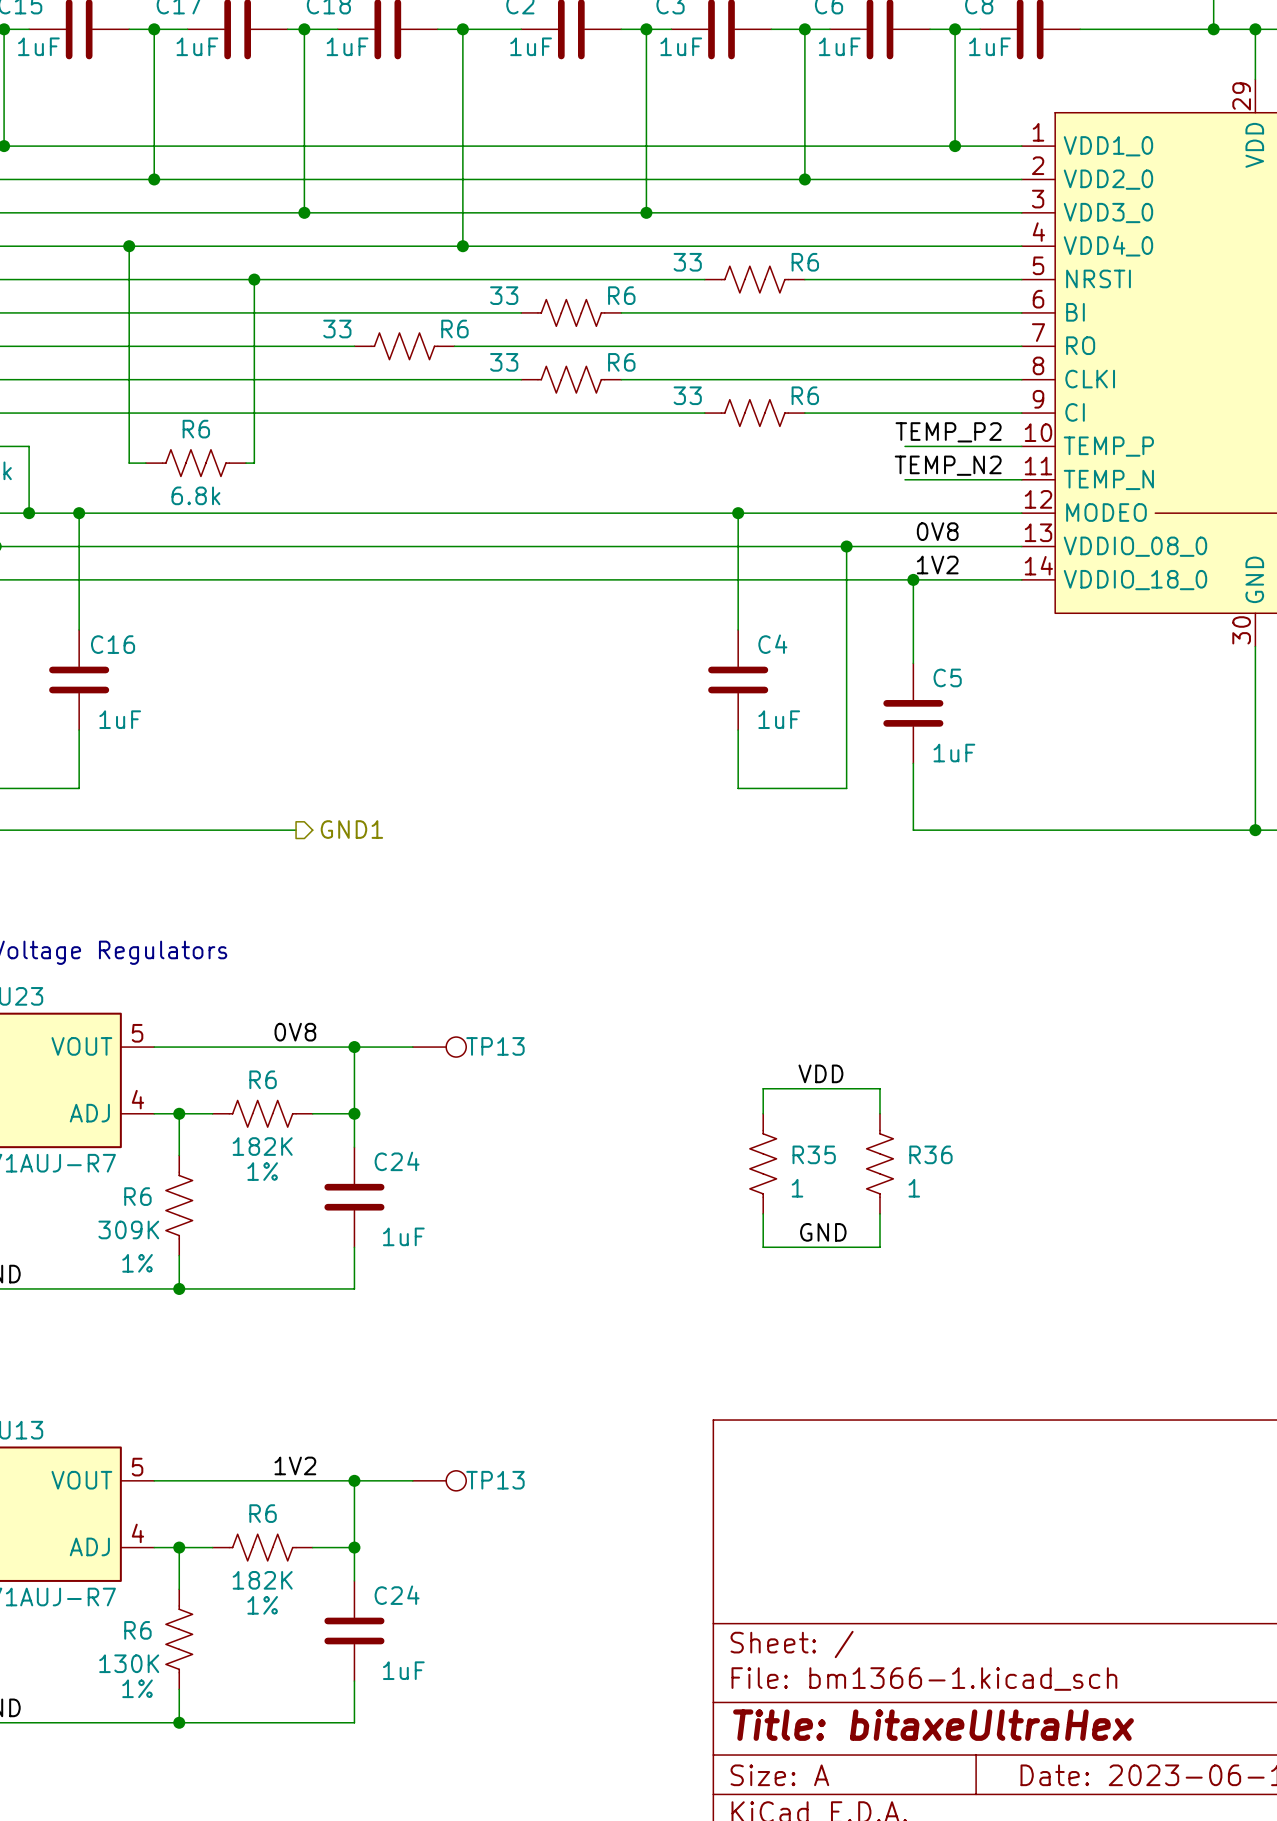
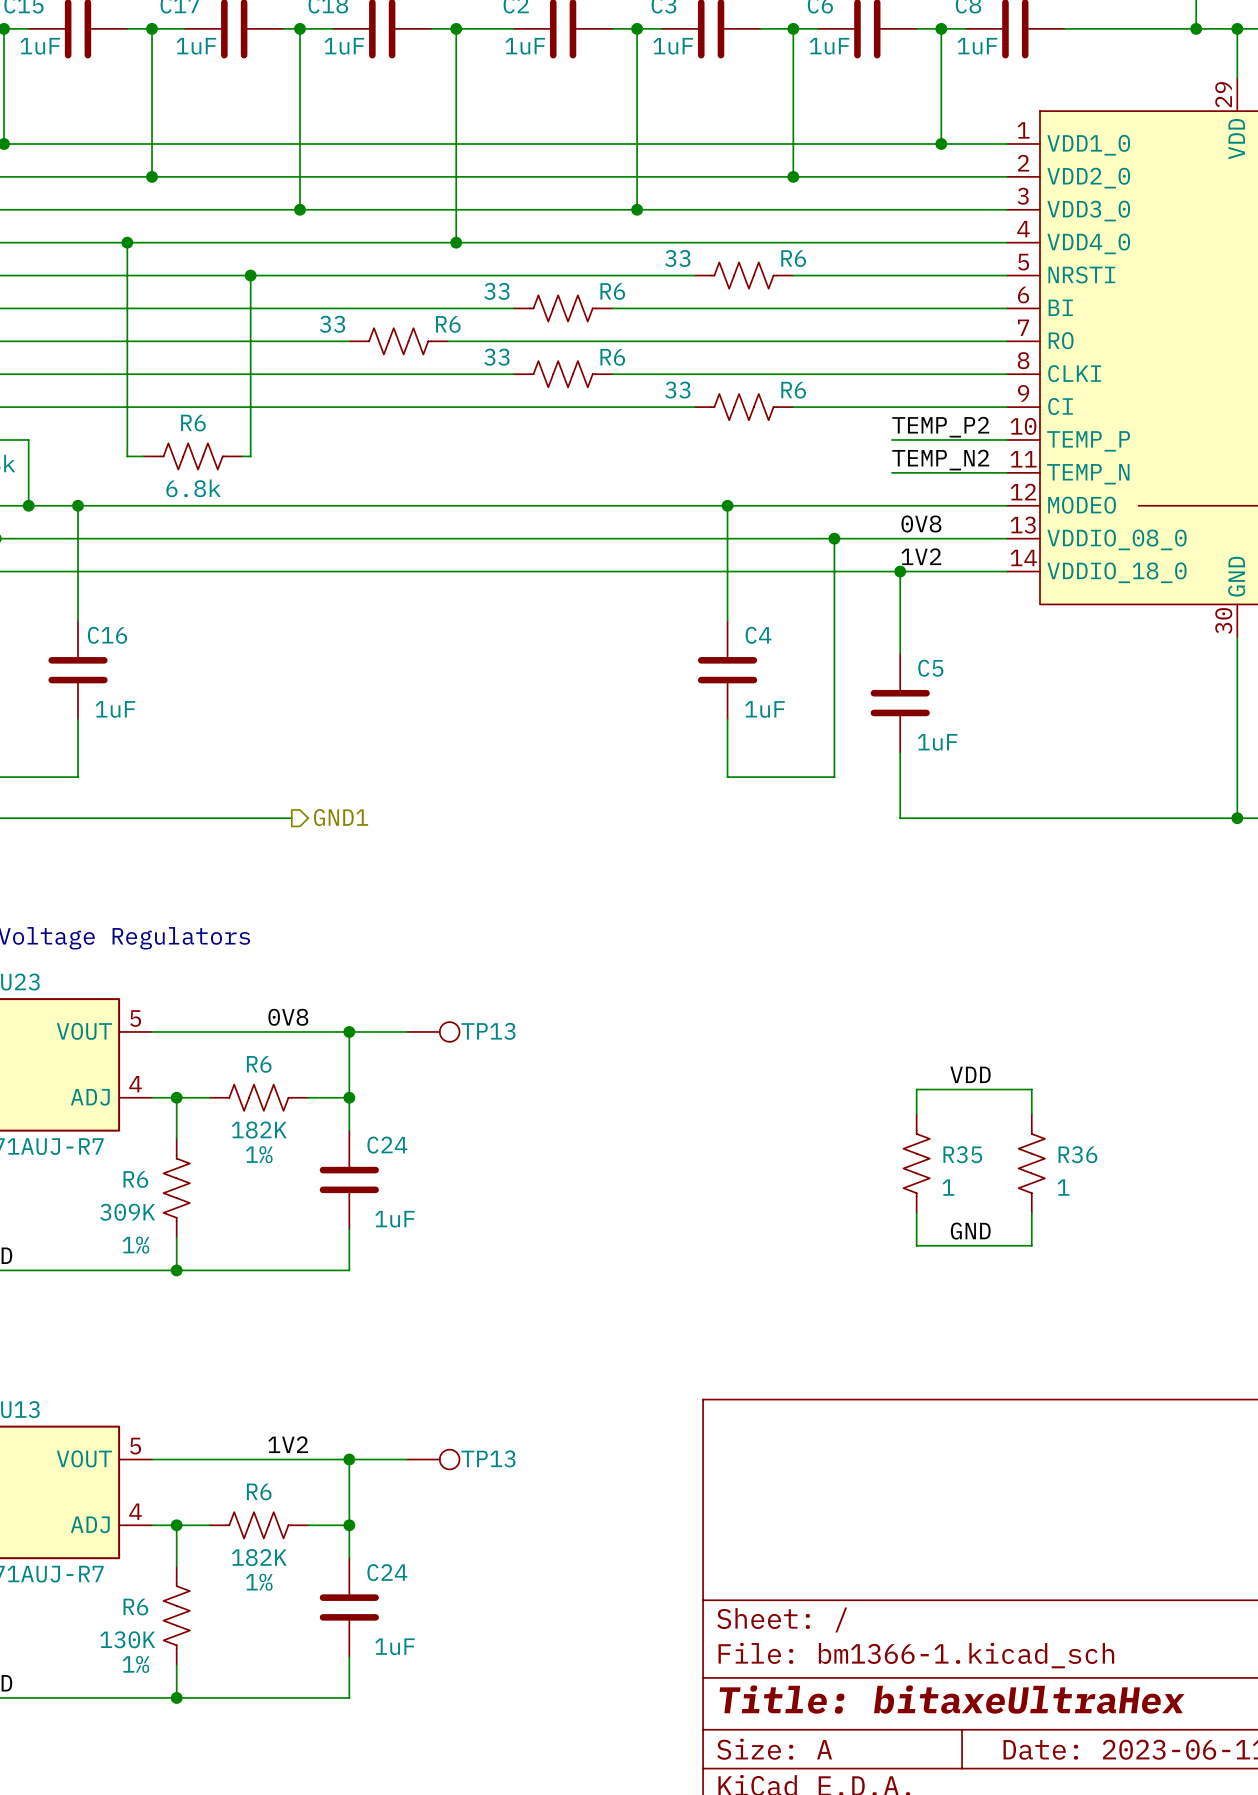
label position: VDD (820, 1073) -> VDD (970, 1074)
wire: (763, 1113) (763, 1088) (879, 1088) (879, 1113) -> (916, 1114) (916, 1089) (1031, 1089) (1031, 1114)
R35 position: (763, 1163) -> (916, 1163)
R36 position: (879, 1163) -> (1031, 1163)
wire: (763, 1213) (763, 1247) (879, 1247) (879, 1213) -> (916, 1212) (916, 1245) (1031, 1245) (1031, 1212)
label position: GND (823, 1232) -> GND (970, 1231)

